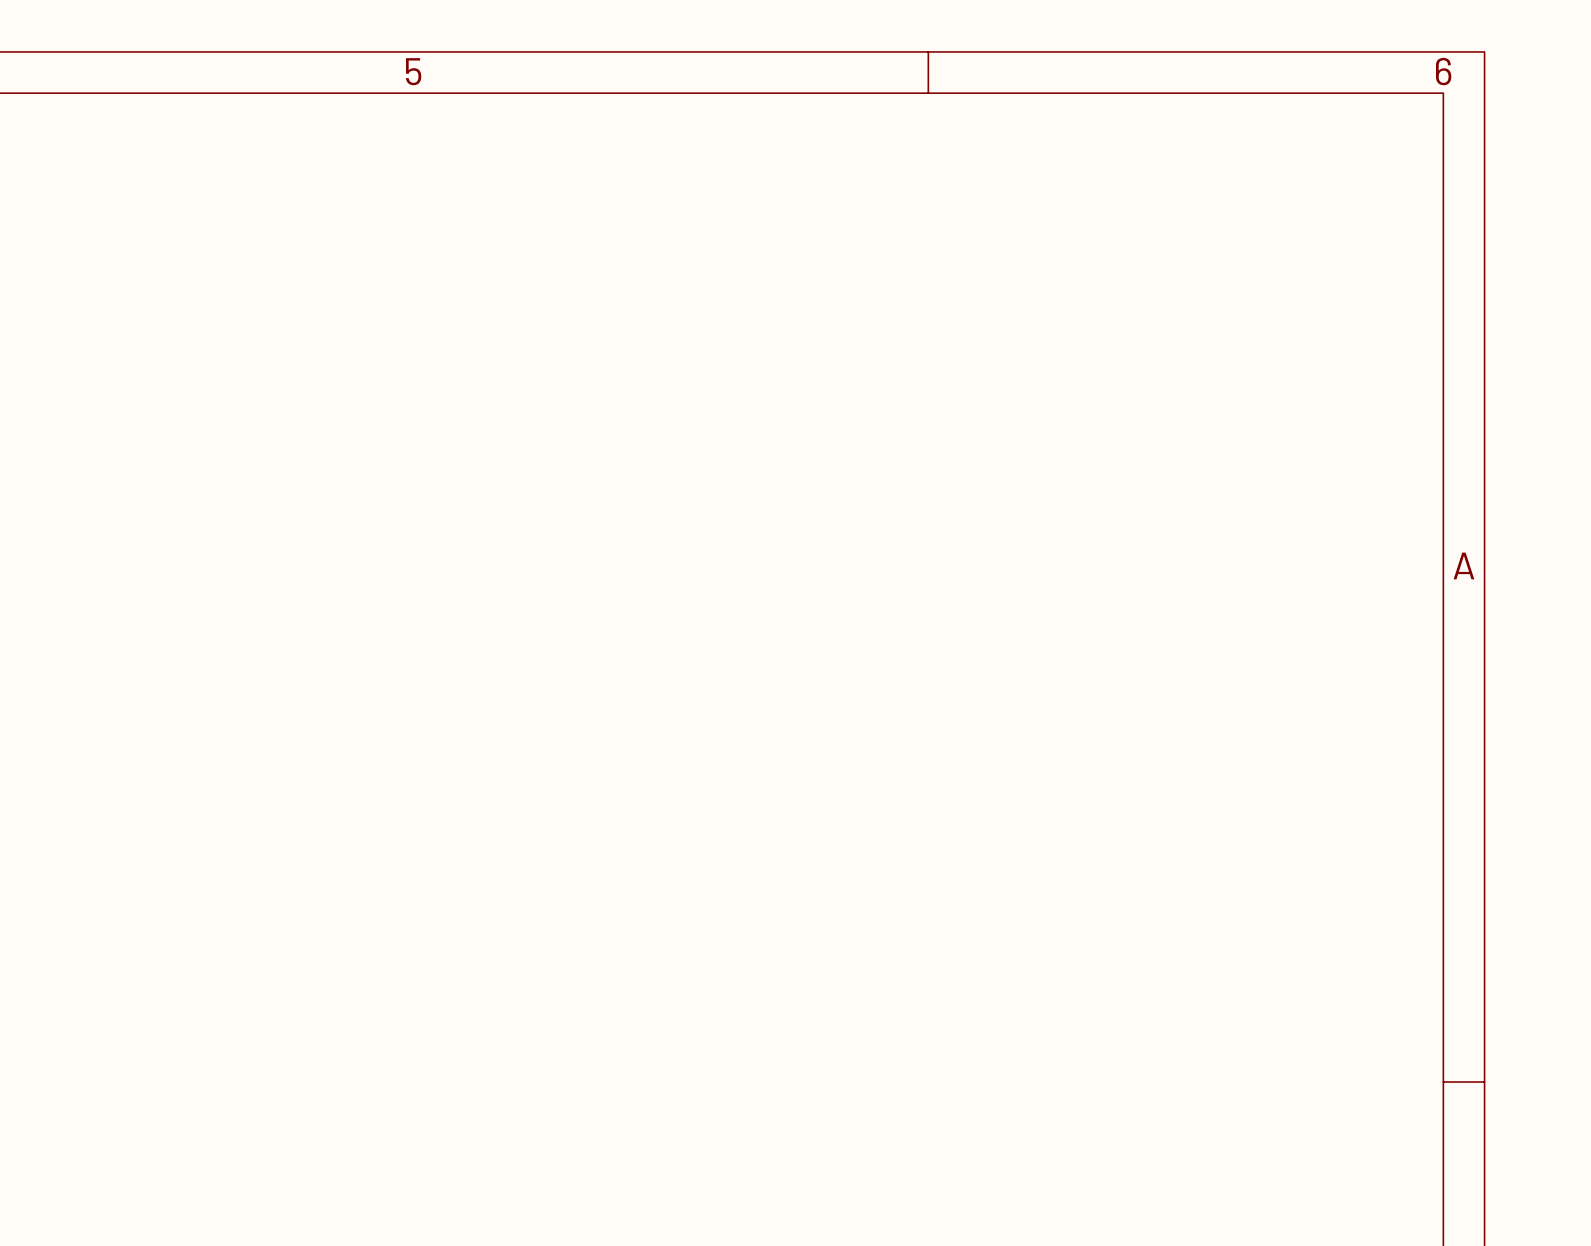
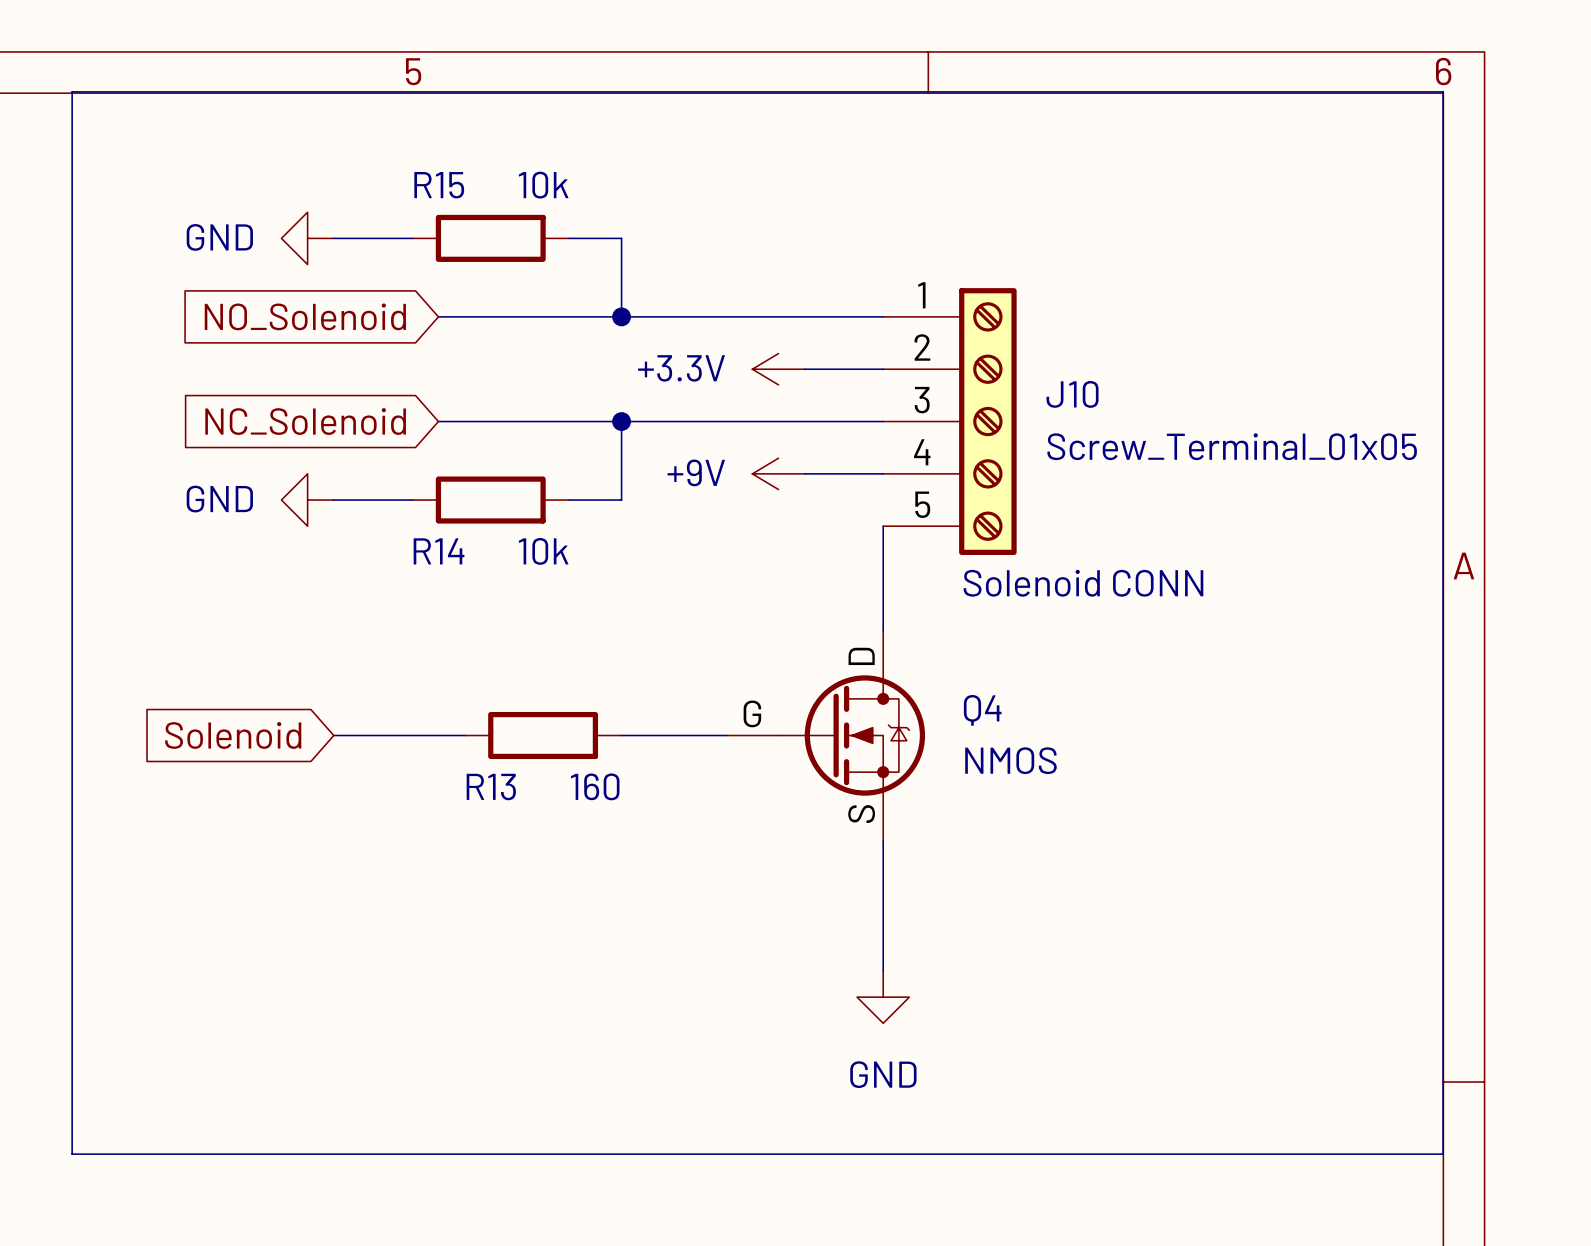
line: none -> (72, 91) (1443, 91) (1443, 1154) (72, 1154) (72, 91)
power symbol: none -> GND (307, 238)
wire: none -> (333, 238) (412, 238)
R15: none -> 10k (490, 238)
wire: none -> (569, 238) (621, 238) (621, 316)
global label: none -> NO_Solenoid (305, 316)
wire: none -> (438, 316) (883, 316)
junction: none -> (621, 316)
power symbol: none -> +3.3V (778, 369)
wire: none -> (804, 369) (883, 369)
global label: none -> NC_Solenoid (305, 421)
wire: none -> (438, 421) (883, 421)
wire: none -> (621, 421) (621, 500) (569, 500)
junction: none -> (621, 421)
J10: none -> Screw_Terminal_01x05 (949, 421)
power symbol: none -> +9V (778, 473)
wire: none -> (804, 473) (883, 473)
power symbol: none -> GND (307, 500)
wire: none -> (333, 500) (412, 500)
R14: none -> 10k (490, 500)
wire: none -> (883, 526) (883, 630)
text: none -> Solenoid CONN (1083, 583)
global label: none -> Solenoid (233, 735)
wire: none -> (333, 735) (464, 735)
R13: none -> 160 (543, 735)
wire: none -> (621, 735) (726, 735)
Q4: none -> NMOS (825, 735)
wire: none -> (883, 840) (883, 970)
power symbol: none -> GND (883, 997)

